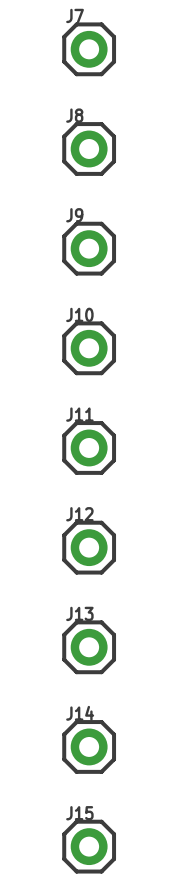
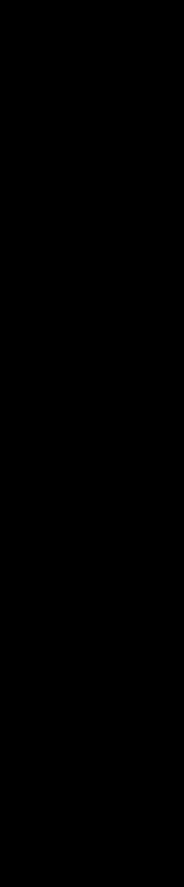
J7: (89, 49) -> none
J8: (89, 148) -> none
J9: (89, 248) -> none
J10: (89, 348) -> none
J11: (89, 447) -> none
J12: (89, 547) -> none
J13: (89, 647) -> none
J14: (89, 746) -> none
J15: (89, 846) -> none

